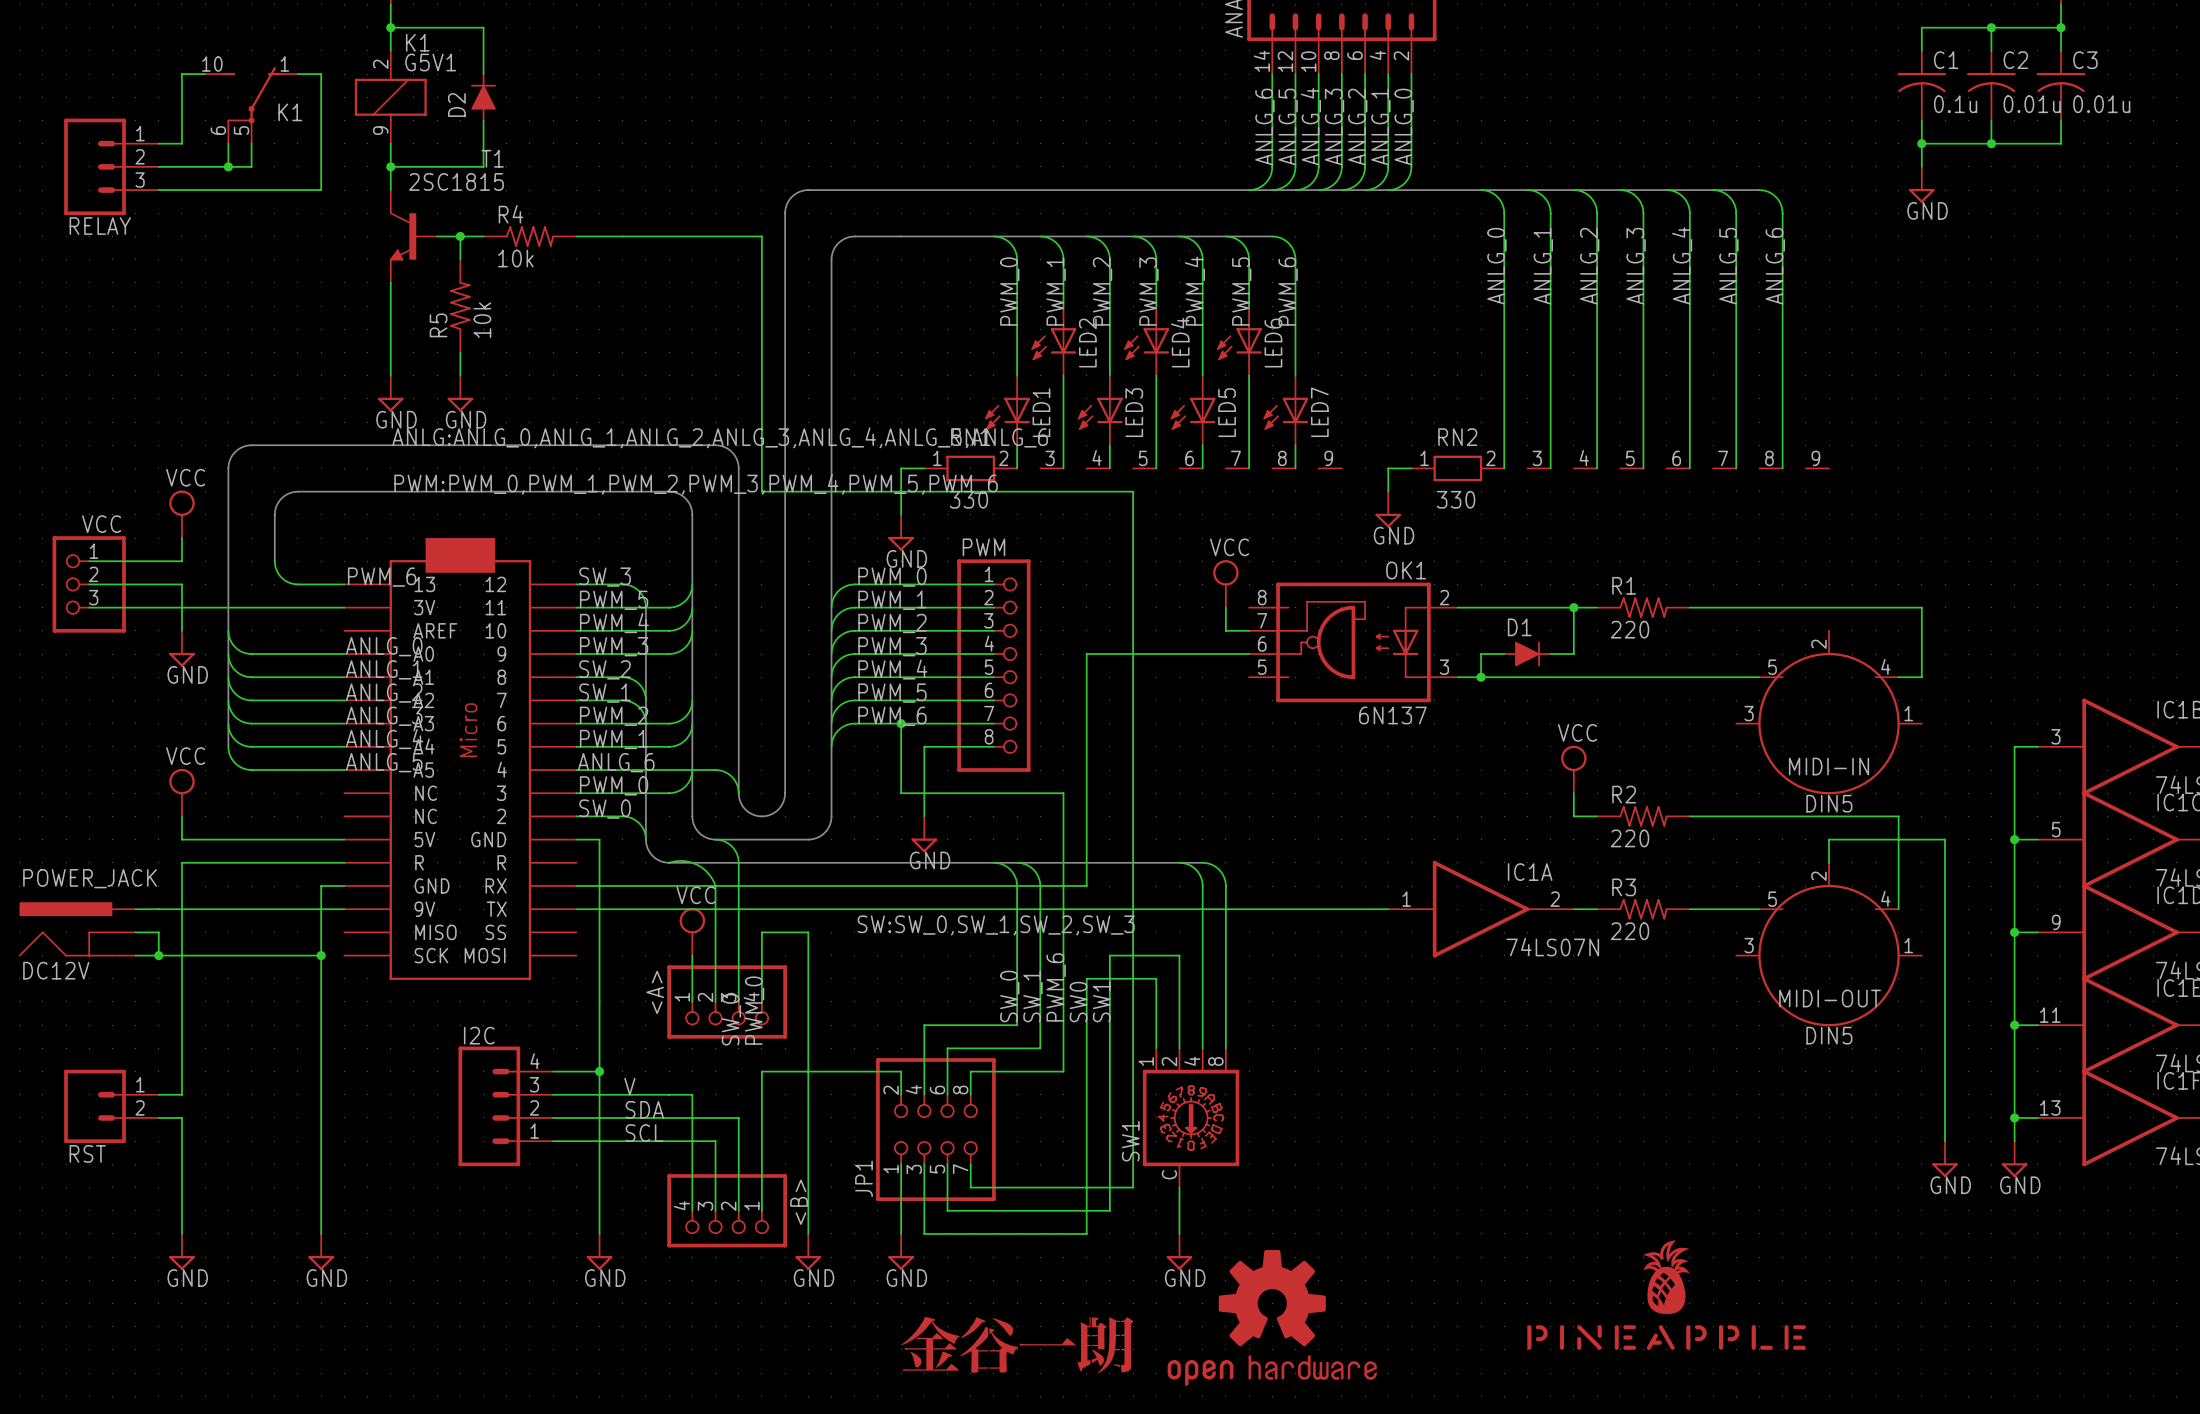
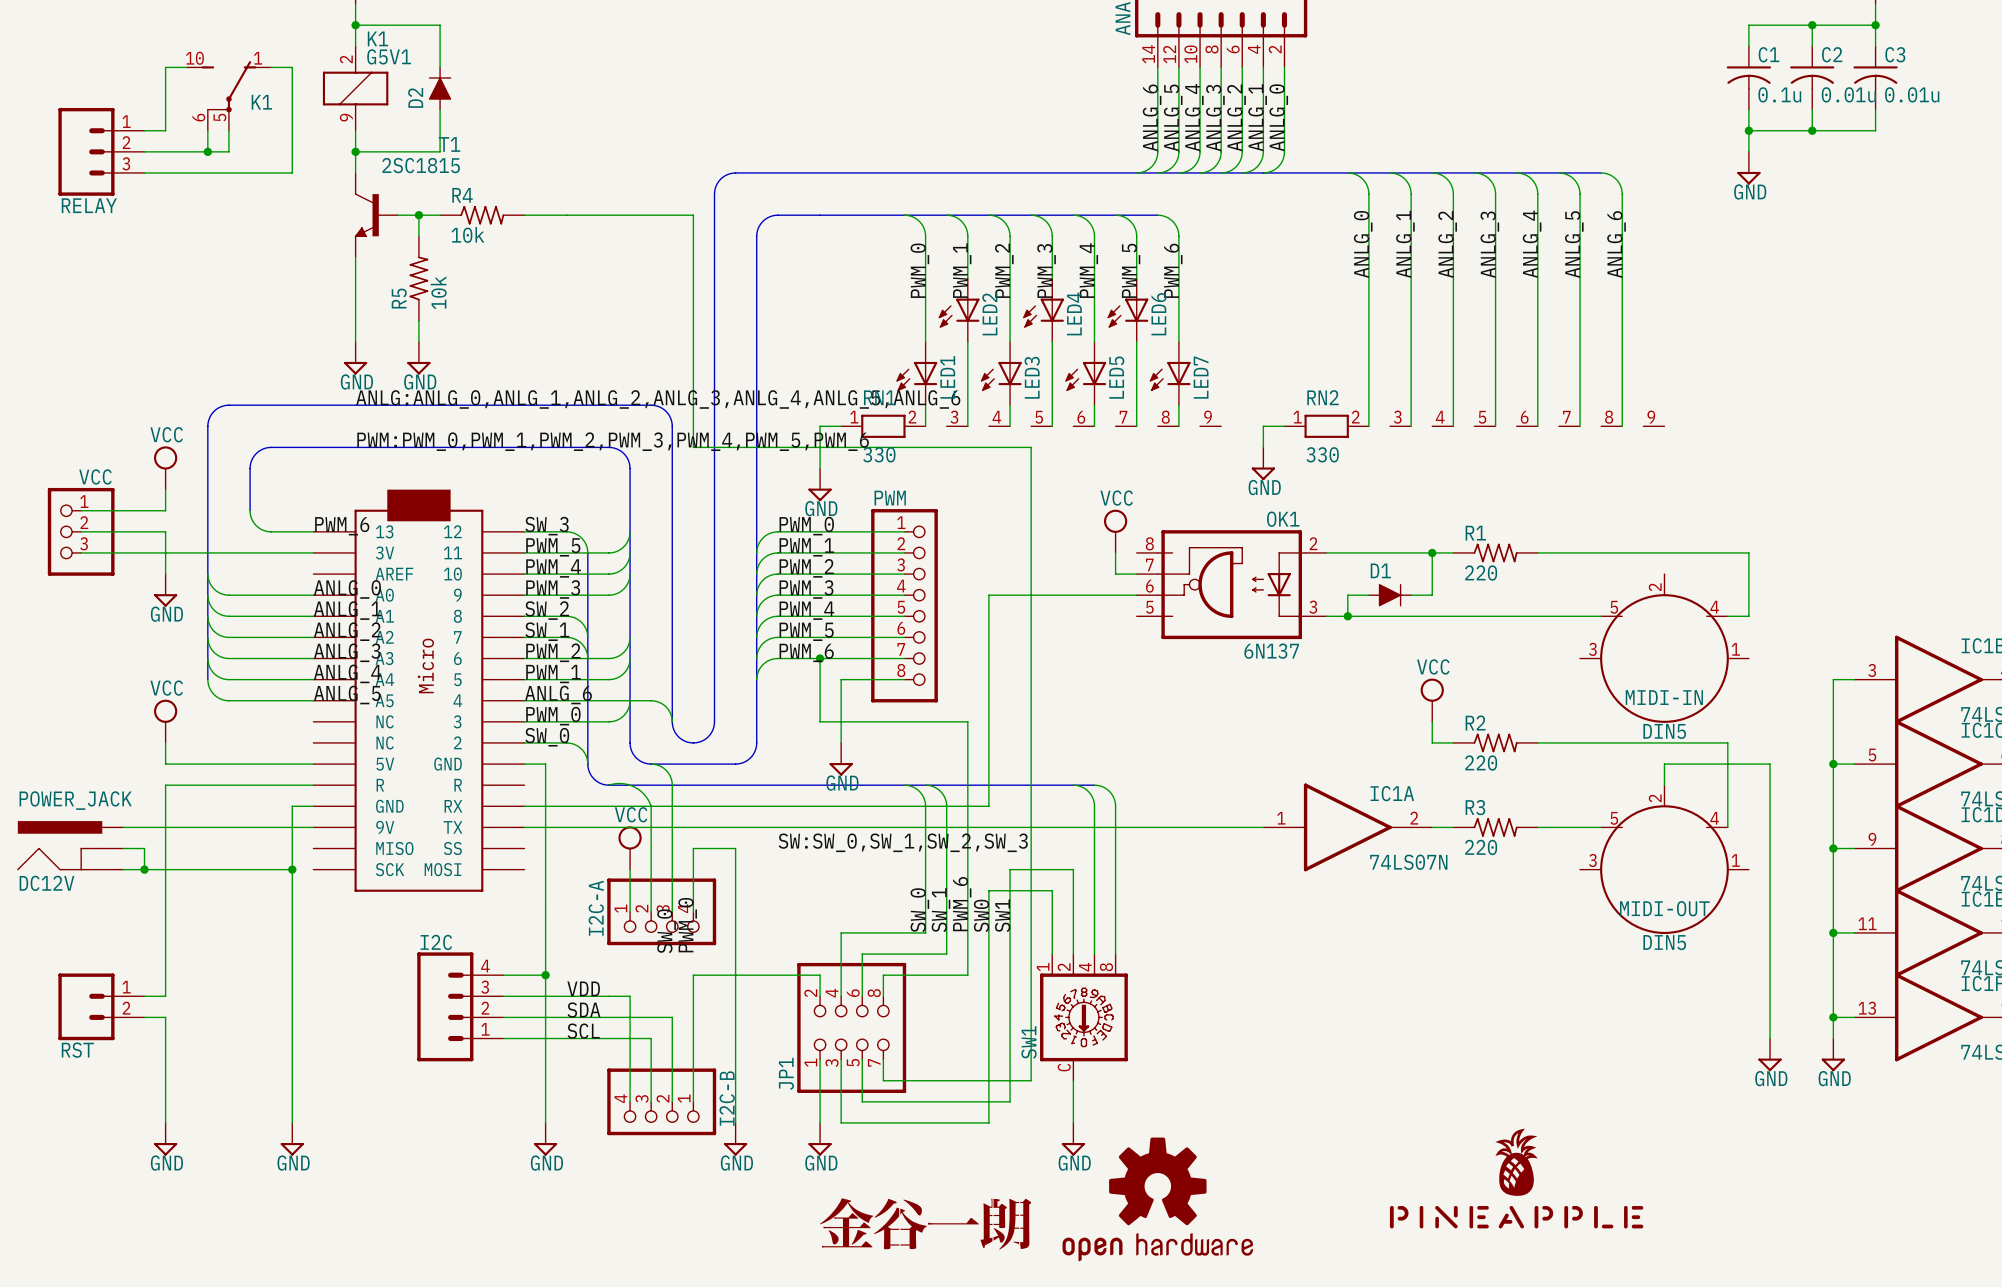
I2C-A name: <A> (655, 992) -> I2C-A (596, 908)
label: V (629, 1086) -> VDD (583, 988)
I2C-B name: <B> (799, 1202) -> I2C-B (727, 1098)

